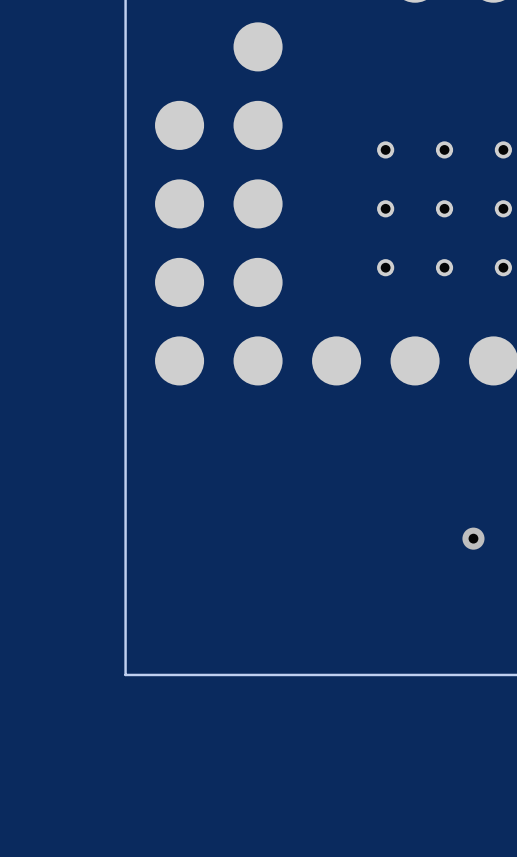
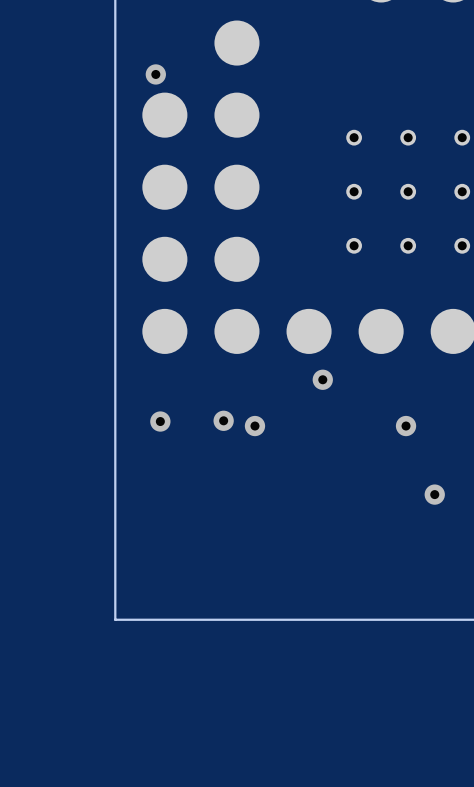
via: none -> (155, 74)
via: none -> (322, 379)
via: none -> (223, 420)
via: none -> (160, 421)
via: none -> (254, 426)
via: none -> (406, 426)

